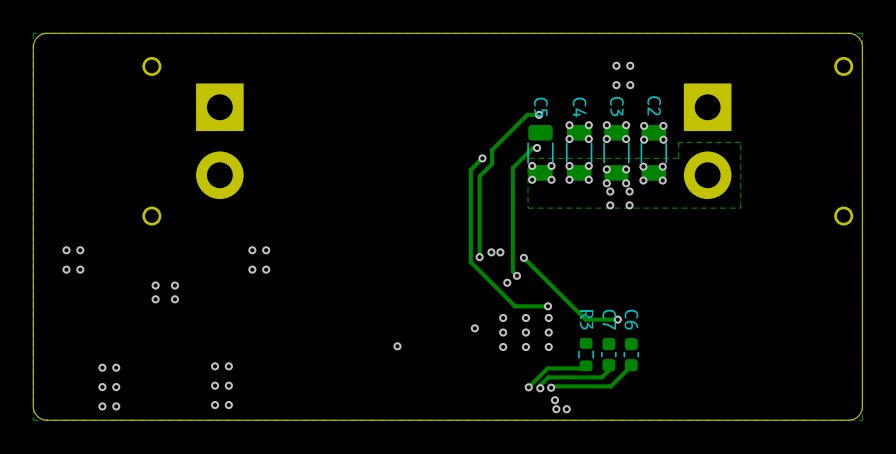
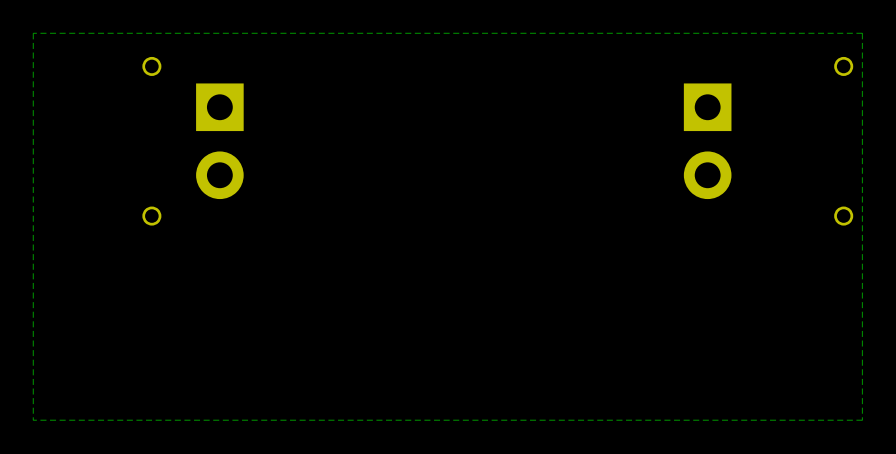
board edge: (848, 33) (41, 34) (35, 40) (33, 47) (34, 411) (38, 417) (47, 420) (853, 419) (859, 414) (862, 406) (862, 47) (858, 37) (848, 33) -> none
via: (616, 65) -> none
via: (630, 65) -> none
via: (616, 85) -> none
via: (630, 85) -> none
track: (539, 114) (527, 114) (492, 150) (492, 163) (479, 176) (479, 257) -> none
via: (539, 114) -> none
via: (569, 125) -> none
via: (588, 125) -> none
via: (606, 125) -> none
via: (626, 125) -> none
via: (644, 125) -> none
via: (663, 125) -> none
via: (569, 139) -> none
via: (588, 139) -> none
via: (606, 139) -> none
via: (626, 139) -> none
via: (644, 139) -> none
via: (663, 139) -> none
zone outline: (740, 142) (740, 208) (528, 208) (528, 158) (678, 158) (678, 142) (740, 142) -> none
track: (537, 148) (532, 148) (512, 167) (512, 271) (516, 275) -> none
via: (537, 148) -> none
C5: (540, 152) -> none
C4: (579, 152) -> none
C3: (616, 152) -> none
C2: (653, 152) -> none
track: (482, 158) (470, 169) (470, 262) (515, 306) (548, 306) -> none
via: (482, 158) -> none
via: (532, 165) -> none
via: (551, 165) -> none
via: (569, 165) -> none
via: (588, 165) -> none
via: (643, 166) -> none
via: (662, 166) -> none
via: (606, 169) -> none
via: (626, 169) -> none
via: (532, 179) -> none
via: (551, 179) -> none
via: (569, 179) -> none
via: (588, 179) -> none
via: (643, 180) -> none
via: (662, 180) -> none
via: (606, 183) -> none
via: (626, 183) -> none
via: (610, 191) -> none
via: (629, 191) -> none
via: (610, 205) -> none
via: (629, 205) -> none
via: (66, 250) -> none
via: (80, 250) -> none
via: (252, 250) -> none
via: (266, 250) -> none
via: (491, 252) -> none
via: (500, 252) -> none
via: (479, 257) -> none
track: (523, 257) (585, 319) (617, 319) -> none
via: (523, 257) -> none
via: (66, 269) -> none
via: (80, 269) -> none
via: (252, 269) -> none
via: (266, 269) -> none
via: (516, 275) -> none
via: (507, 282) -> none
via: (155, 285) -> none
via: (174, 285) -> none
via: (155, 299) -> none
via: (174, 299) -> none
via: (548, 306) -> none
via: (503, 317) -> none
via: (525, 317) -> none
via: (548, 317) -> none
via: (617, 319) -> none
via: (474, 328) -> none
via: (503, 332) -> none
via: (525, 332) -> none
via: (548, 332) -> none
via: (397, 346) -> none
via: (503, 347) -> none
via: (525, 347) -> none
via: (548, 347) -> none
R3: (586, 354) -> none
C7: (608, 354) -> none
C6: (631, 354) -> none
track: (608, 365) (608, 370) (601, 377) (548, 377) (540, 385) (540, 388) -> none
track: (631, 365) (610, 386) (551, 387) -> none
via: (215, 366) -> none
via: (228, 366) -> none
track: (586, 366) (584, 368) (547, 368) (528, 387) -> none
via: (102, 367) -> none
via: (116, 367) -> none
via: (215, 385) -> none
via: (228, 385) -> none
via: (102, 387) -> none
via: (116, 387) -> none
via: (528, 387) -> none
via: (551, 387) -> none
via: (540, 388) -> none
via: (554, 400) -> none
via: (215, 405) -> none
via: (228, 405) -> none
via: (102, 406) -> none
via: (116, 406) -> none
via: (556, 409) -> none
via: (566, 409) -> none

